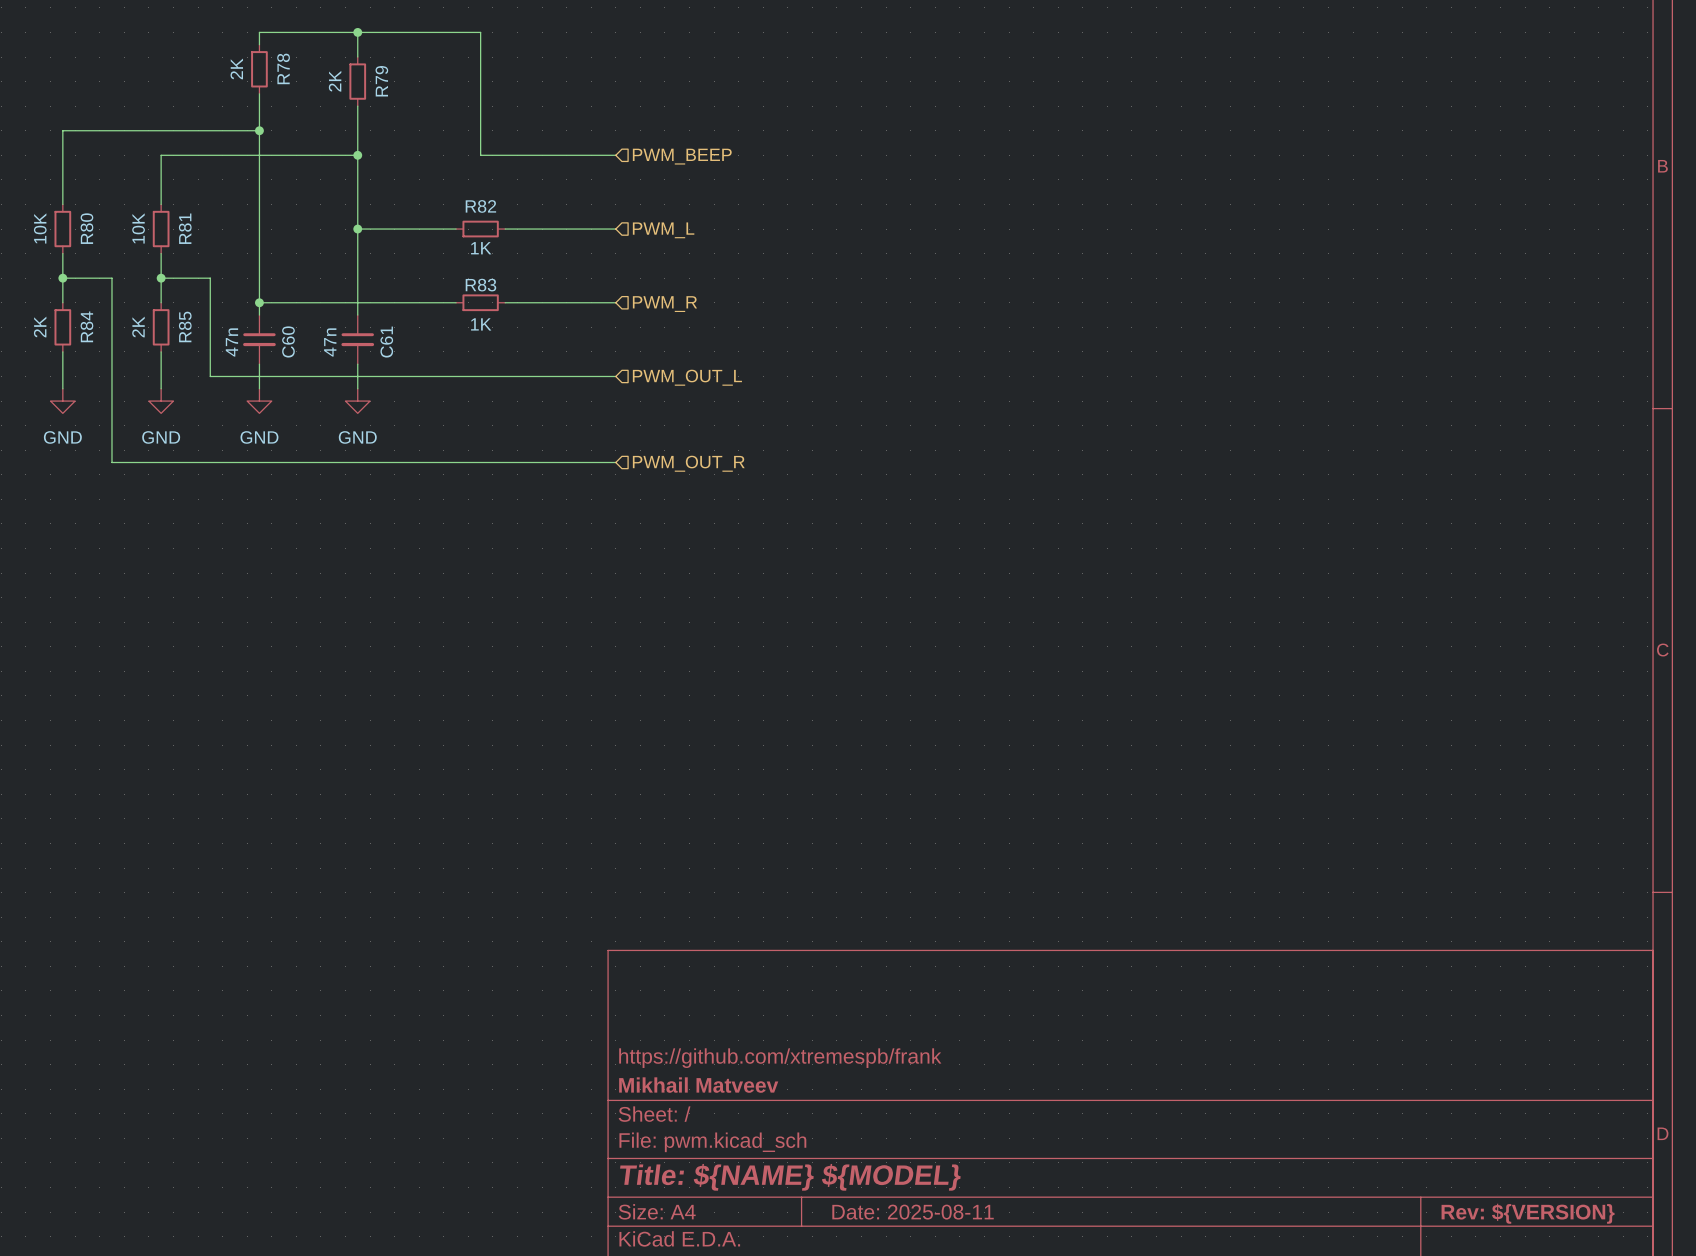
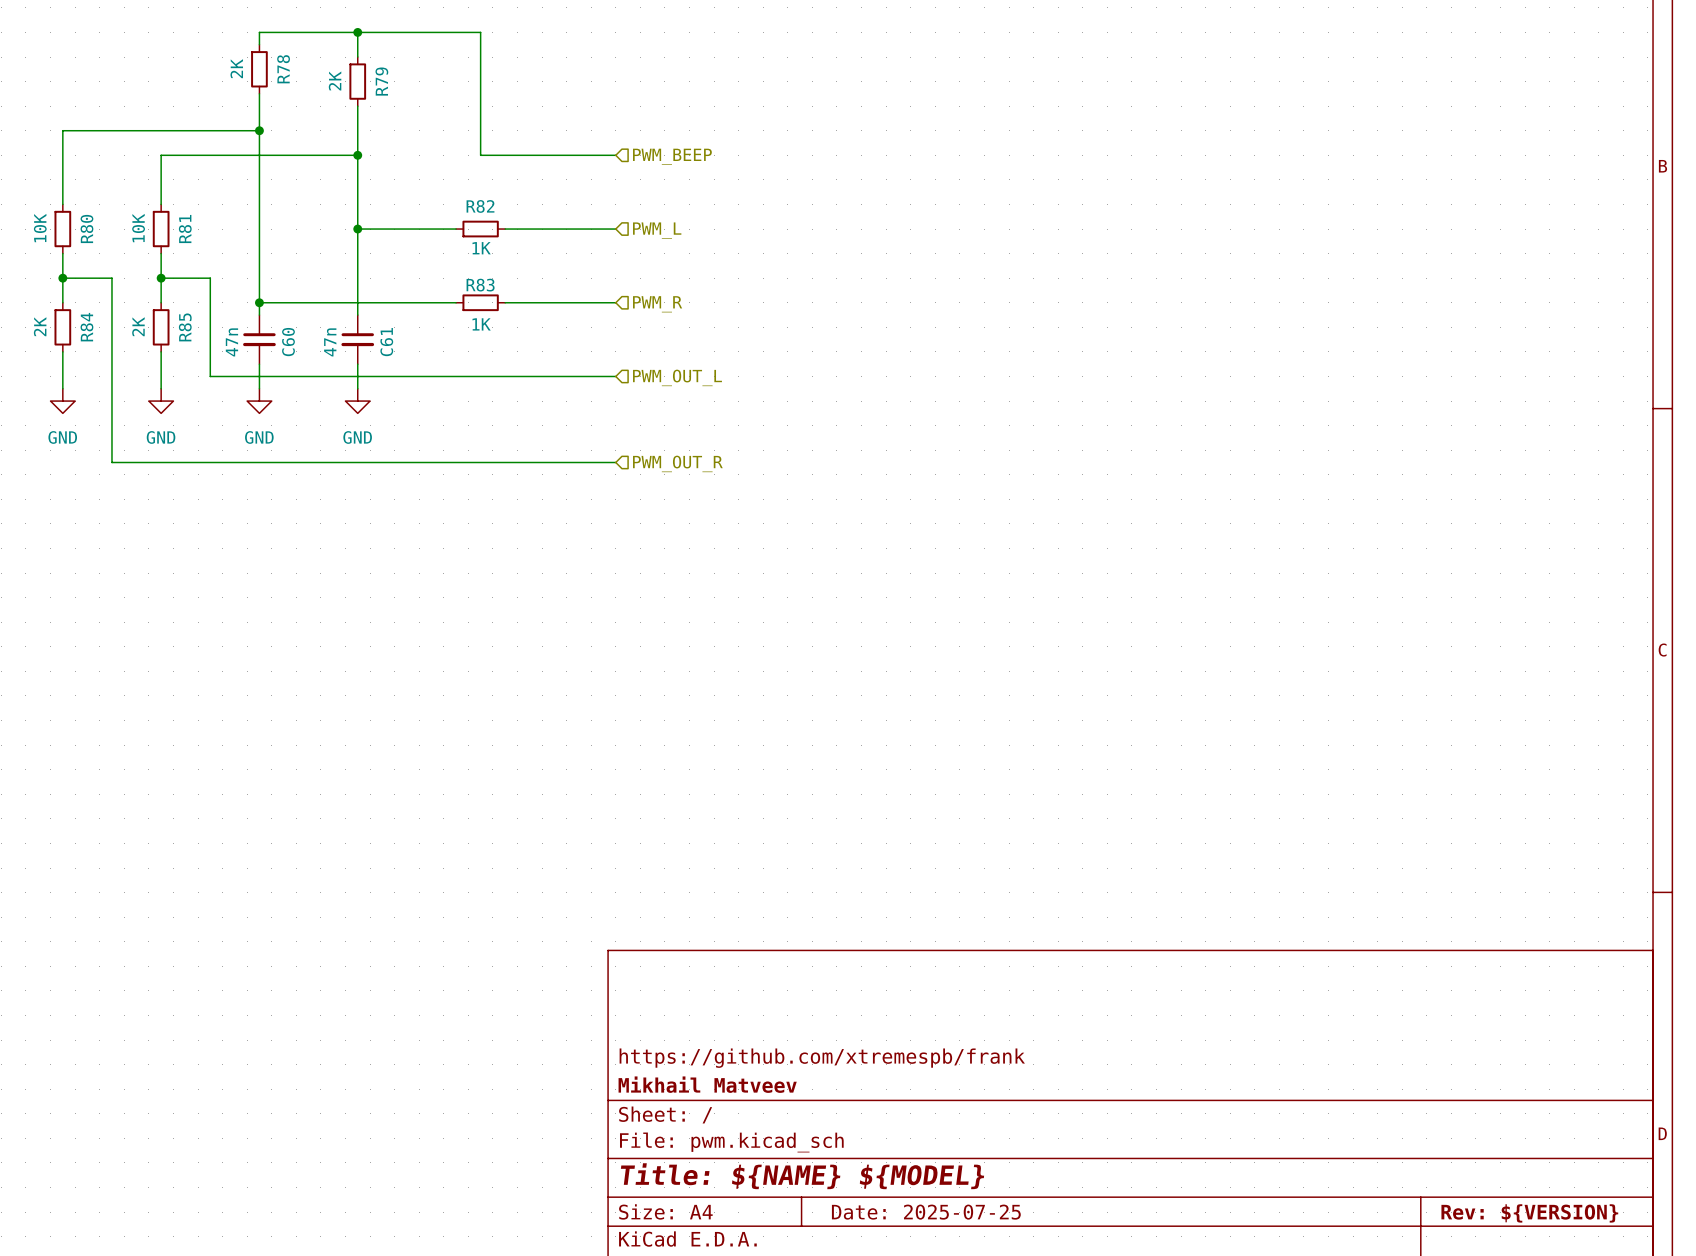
title block: Date: 2025-08-11 (913, 1212) -> Date: 2025-07-25 (926, 1212)

